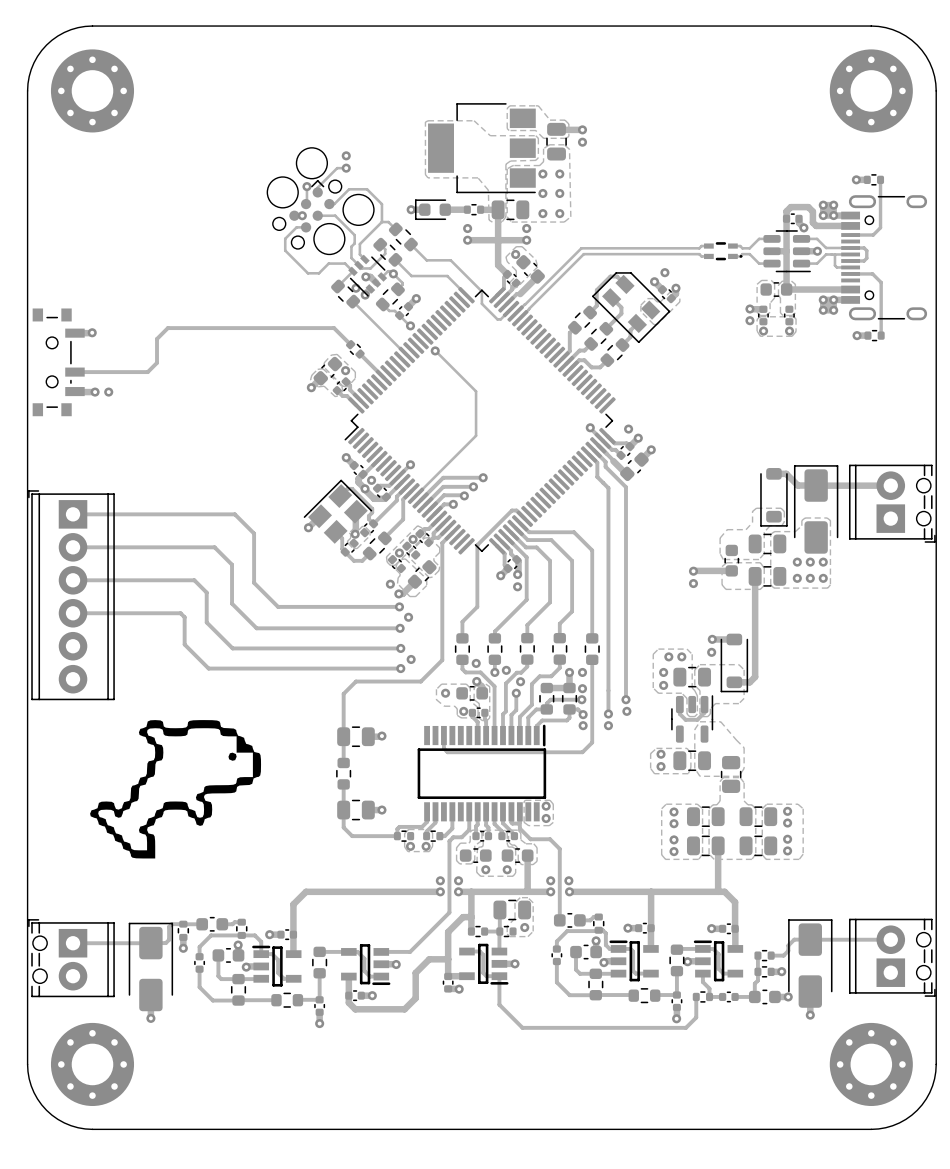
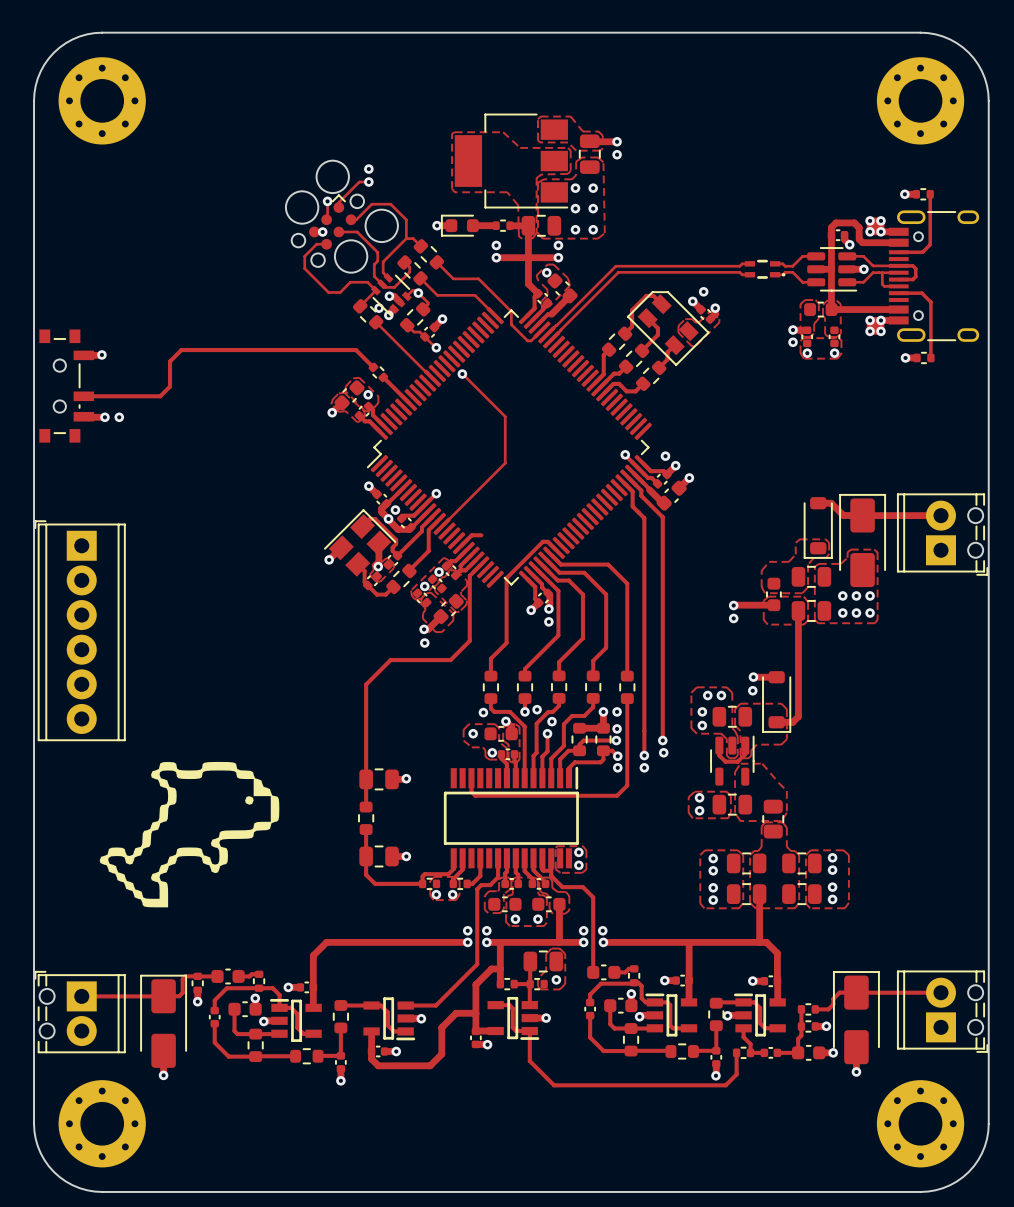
track: (483, 477) (443, 477) (420, 500) -> none
via: (483, 477) -> none
track: (473, 486) (443, 486) (425, 504) -> none
via: (473, 486) -> none
track: (464, 495) (444, 495) (429, 509) -> none
via: (464, 495) -> none
via: (453, 504) -> none
track: (73, 514) (234, 514) (254, 533) (254, 582) (278, 606) (399, 606) -> none
track: (73, 547) (214, 547) (232, 564) (232, 603) (256, 628) (400, 628) -> none
track: (73, 580) (194, 580) (206, 592) (206, 622) (232, 648) (400, 648) -> none
via: (390, 584) -> none
track: (442, 604) (442, 660) (420, 681) (355, 681) (343, 693) -> (469, 640) (450, 660) (390, 660) (366, 684) (366, 734)
track: (73, 613) (180, 613) (184, 617) (184, 644) (208, 668) (400, 668) -> none
via: (408, 617) -> none
via: (400, 628) -> none
via: (400, 648) -> none
via: (411, 659) -> none
via: (476, 663) -> none
via: (400, 668) -> none
via: none -> (483, 712)

